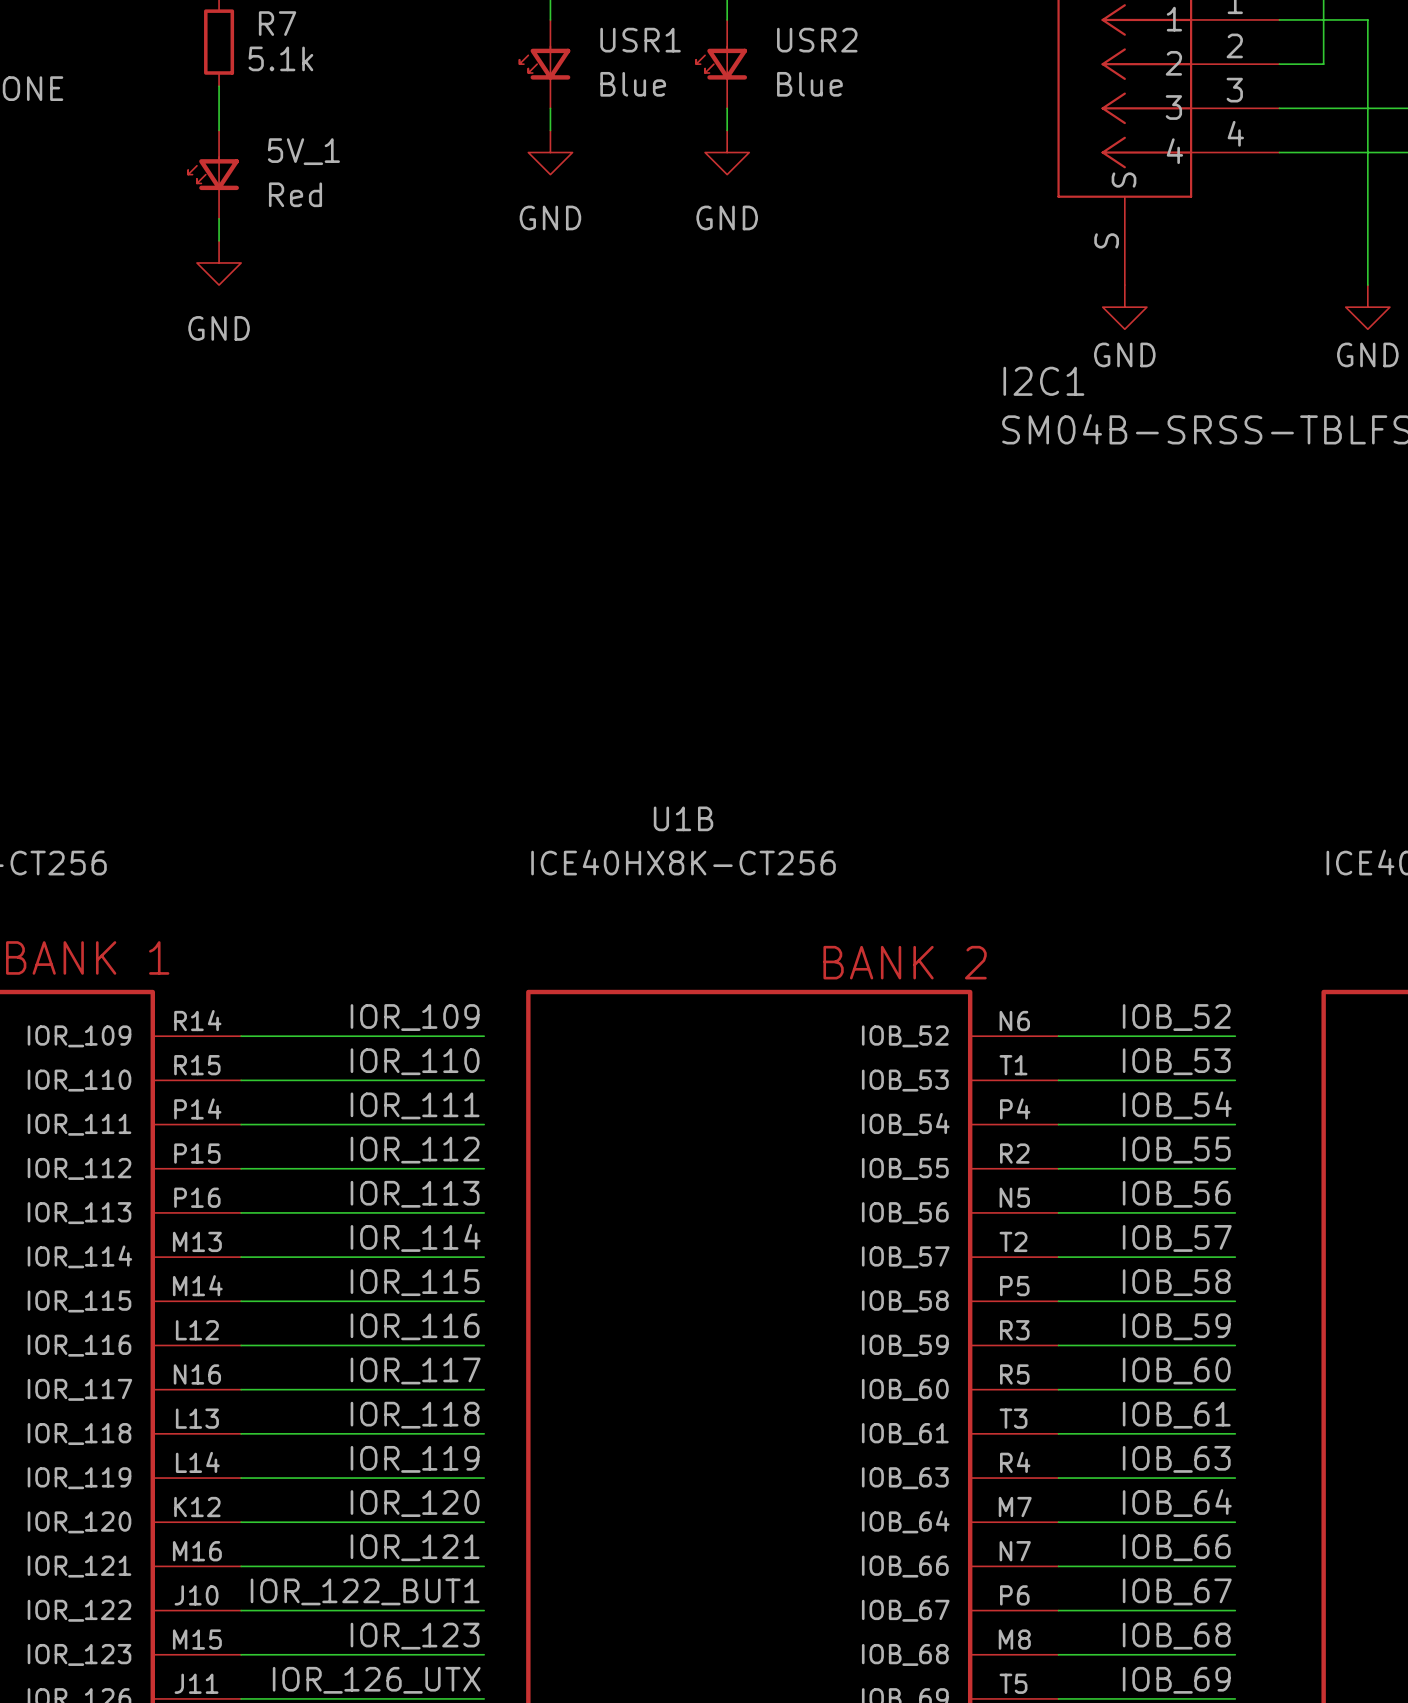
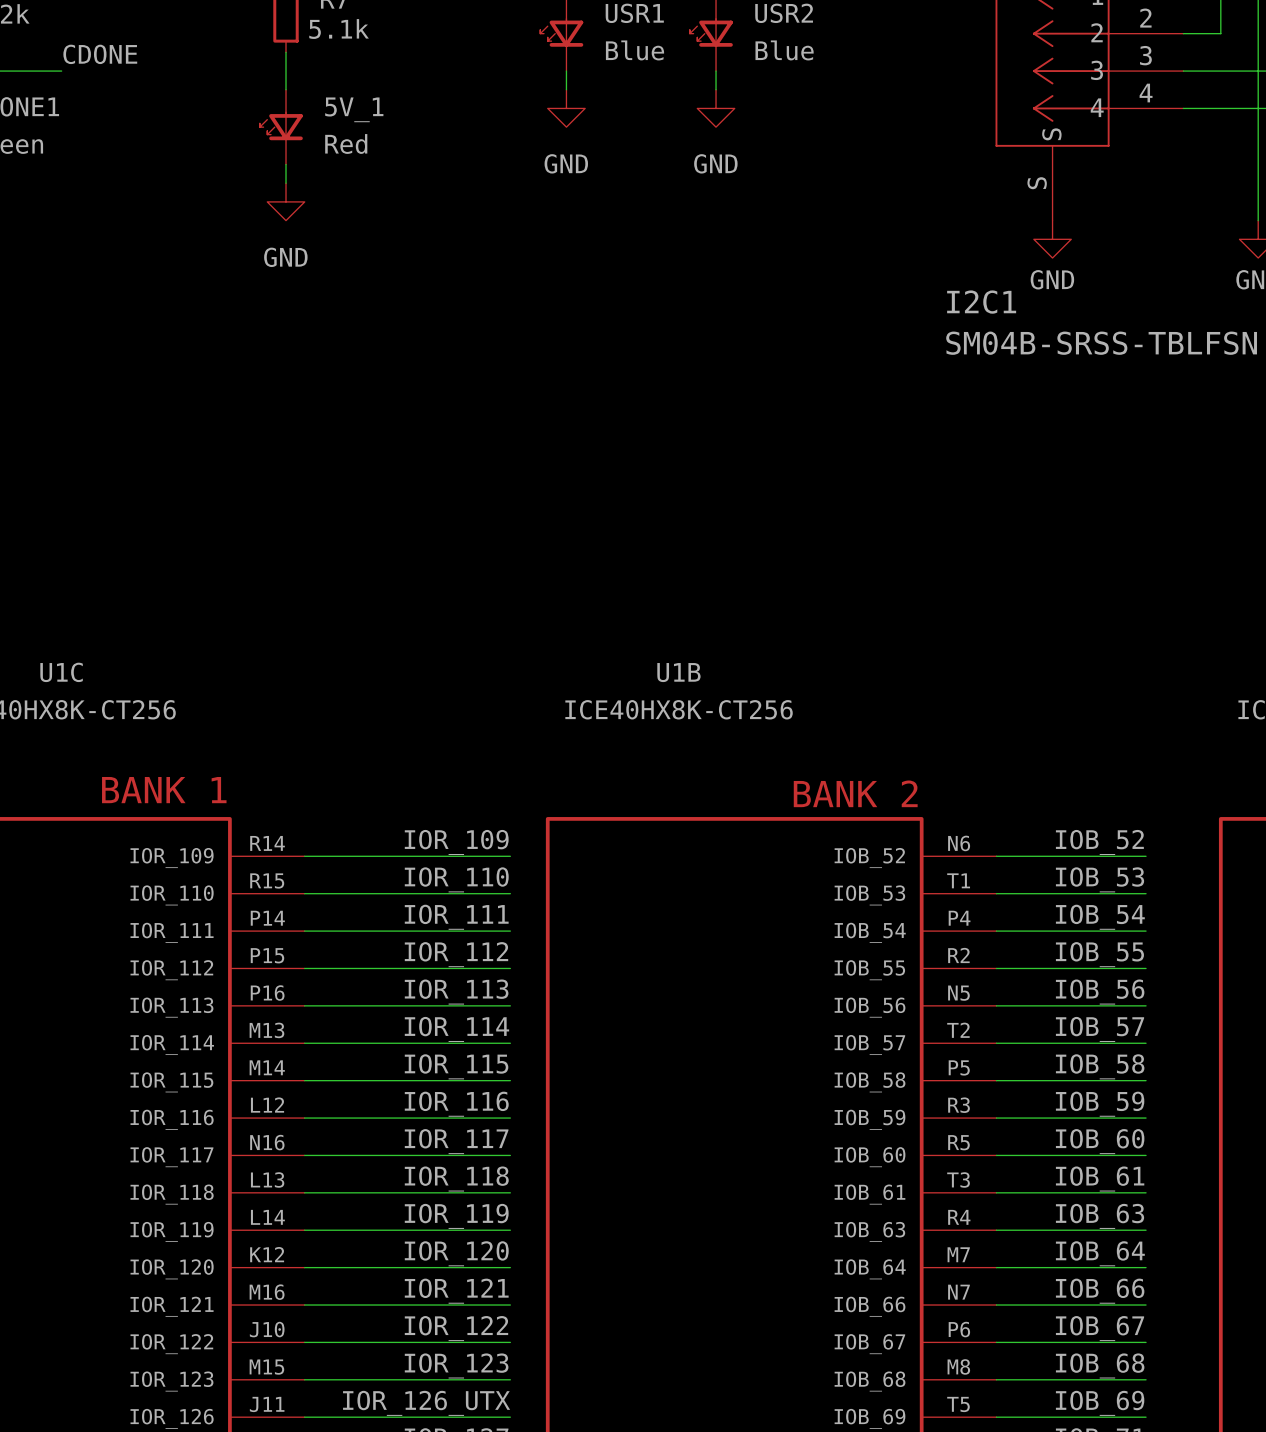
label: IOR_122_BUT1 (365, 1591) -> IOR_122 (456, 1328)

